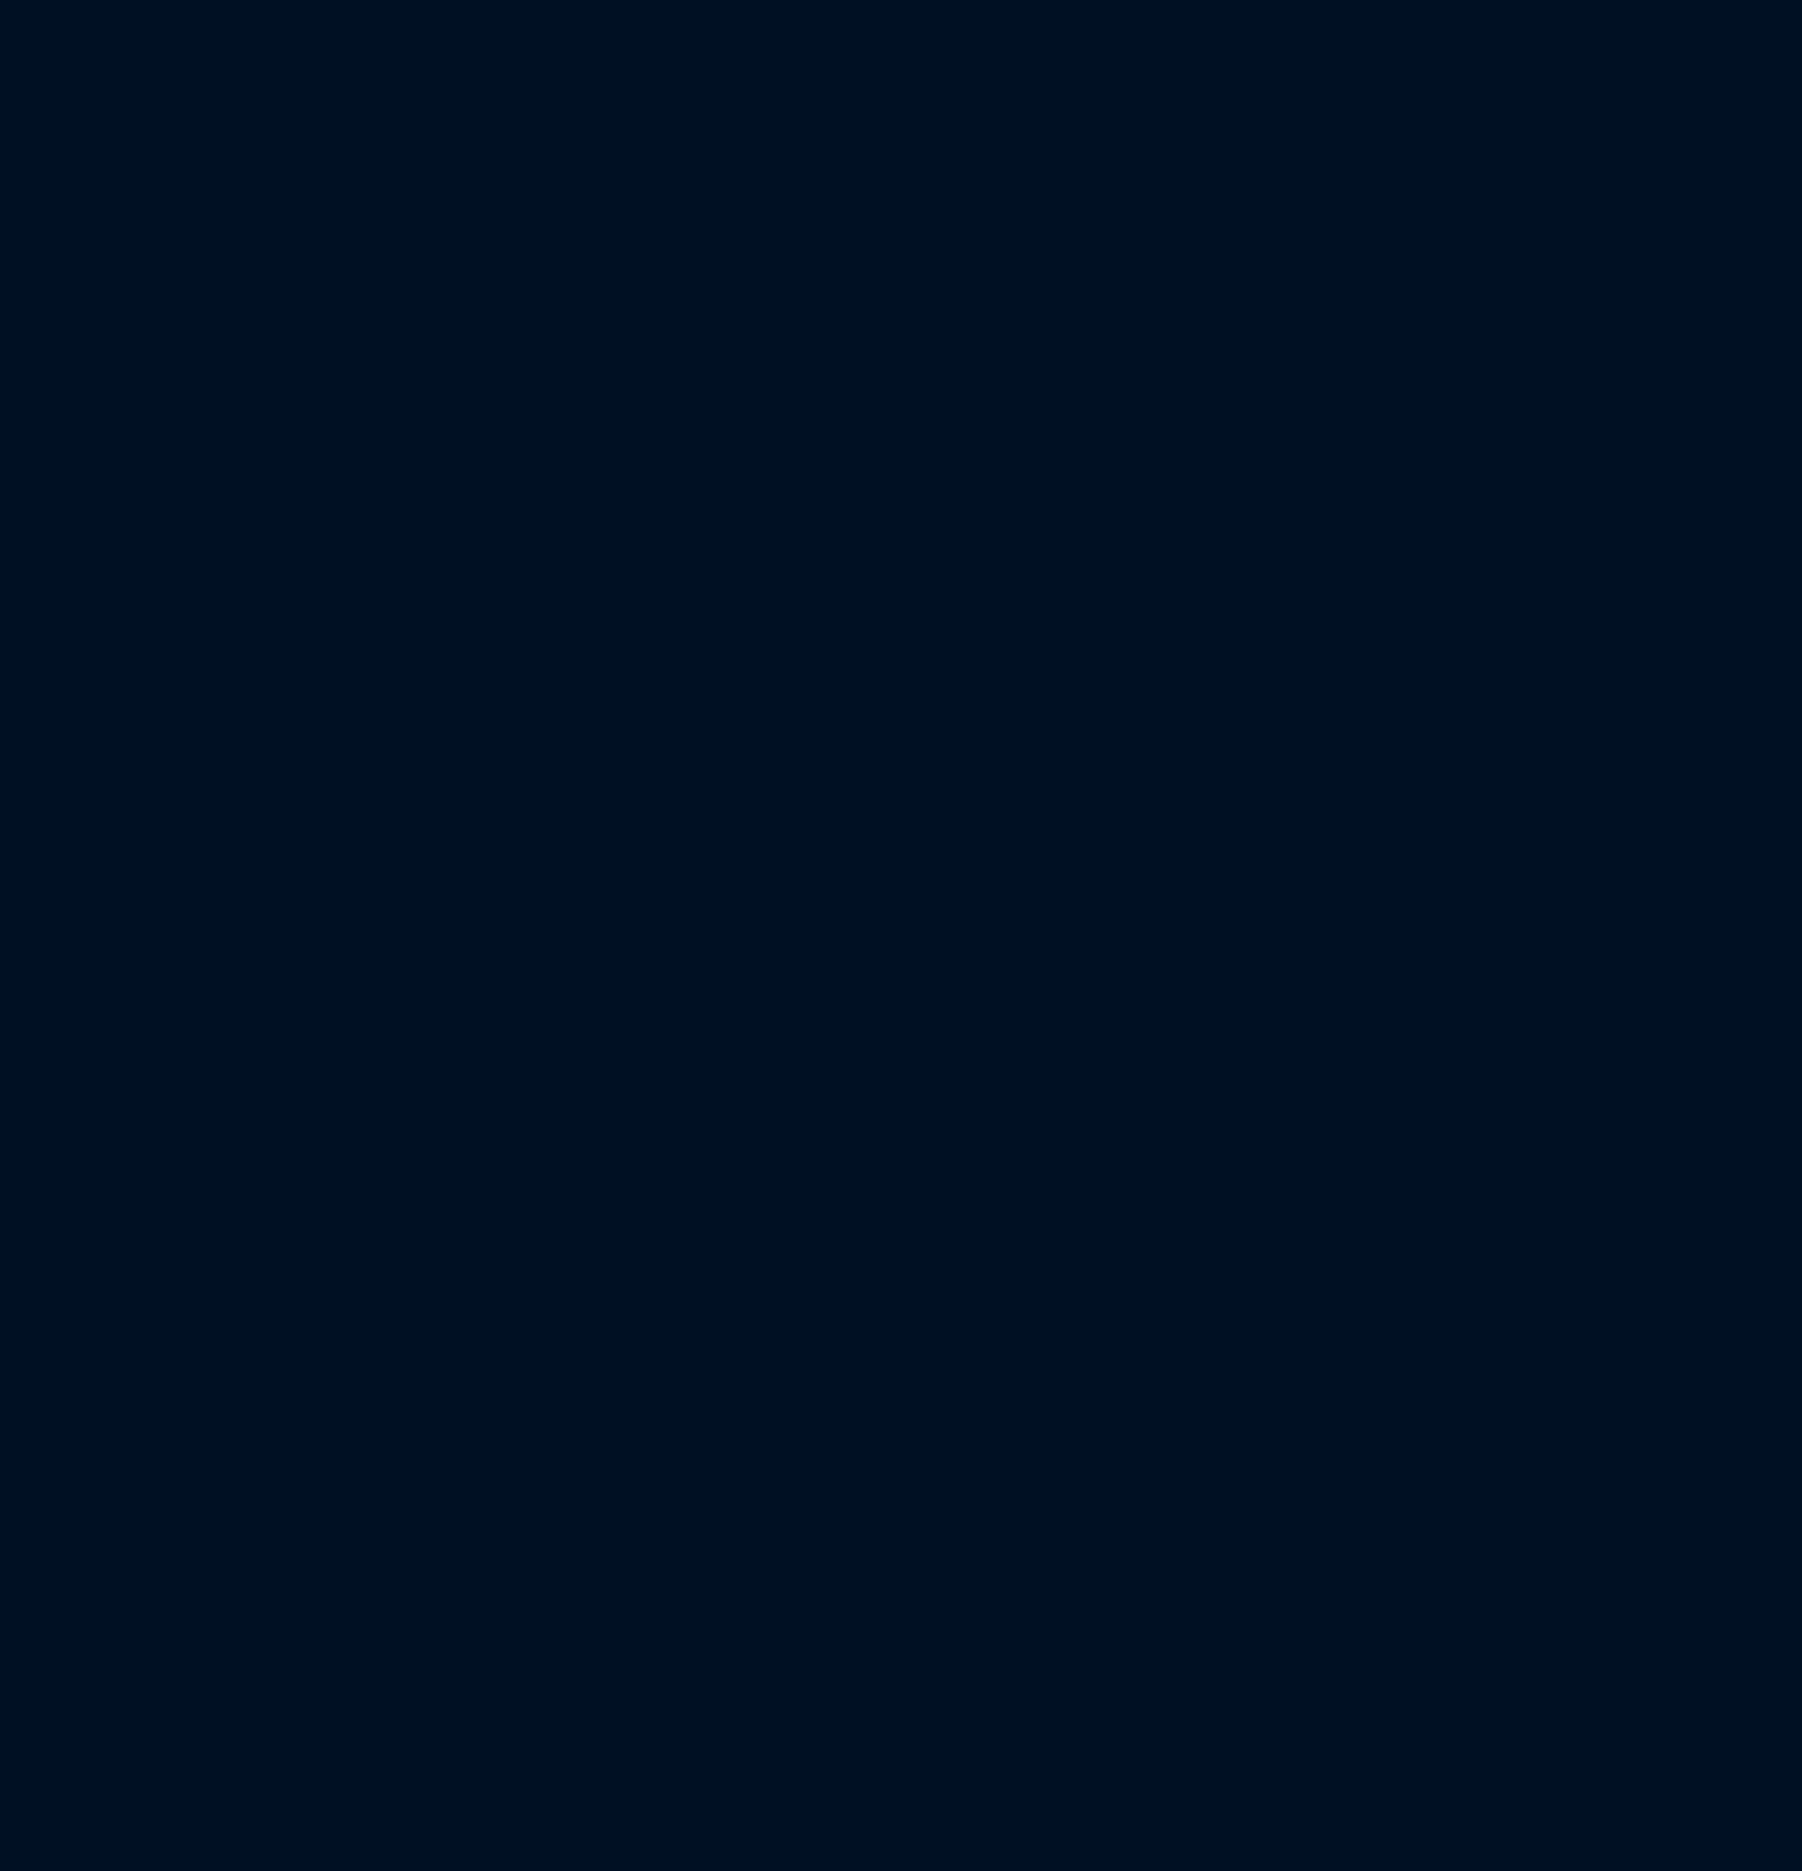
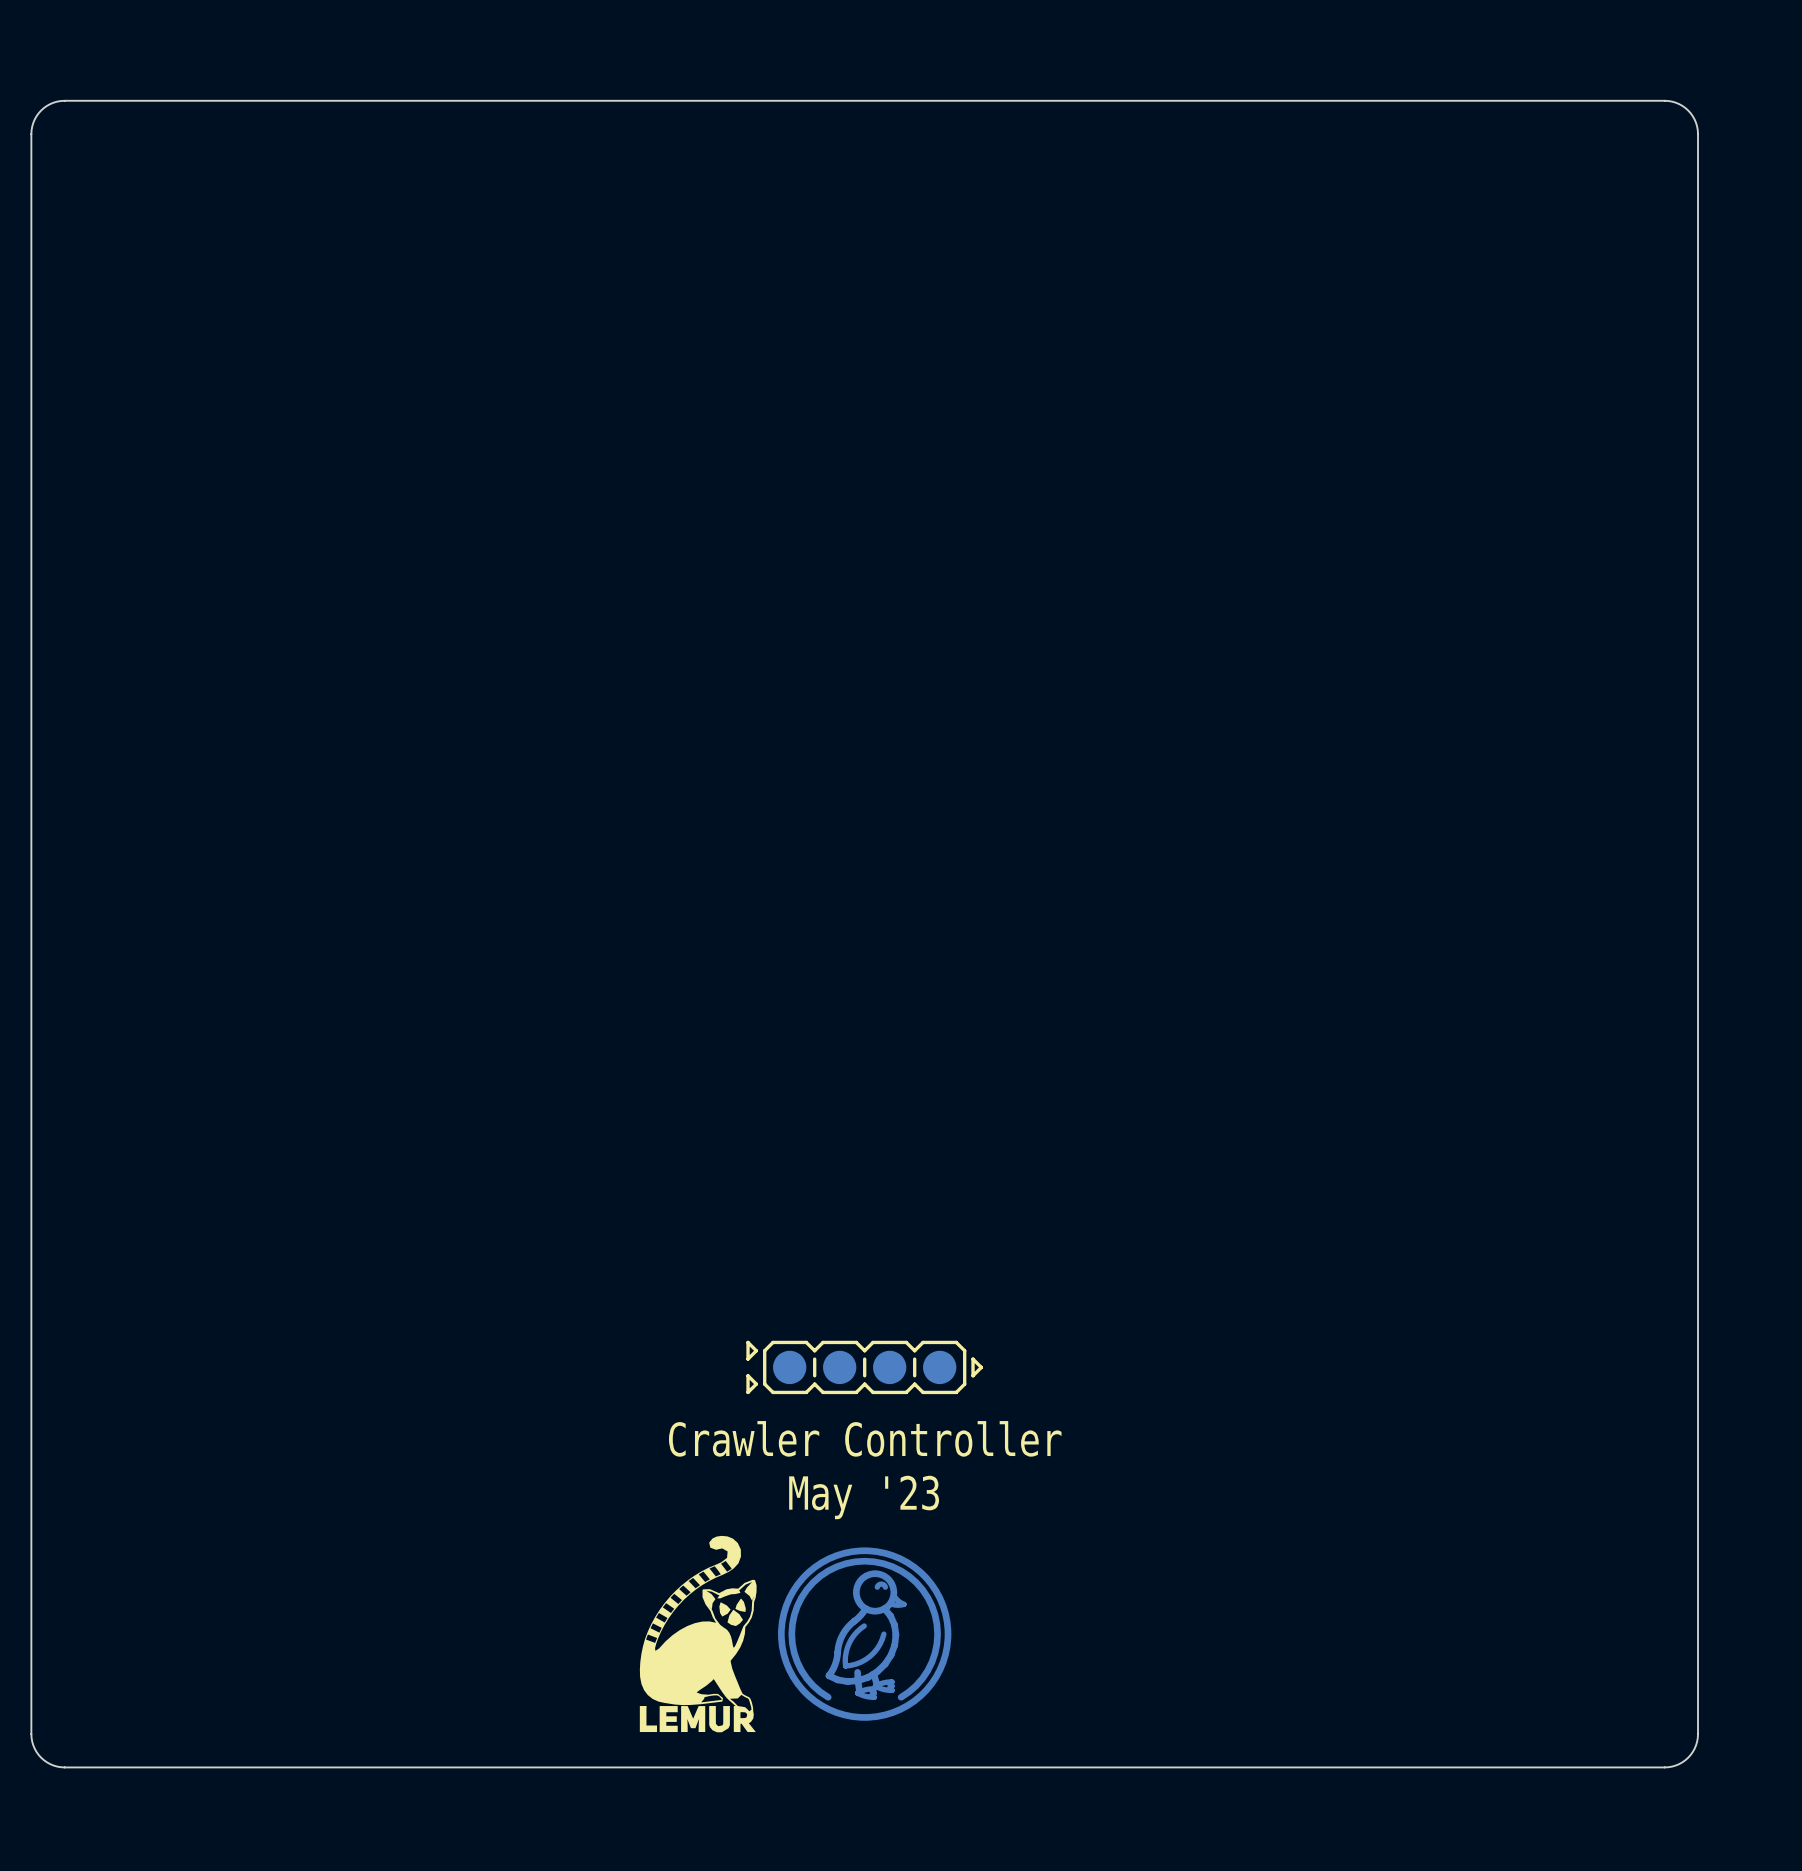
board edge: none -> (1664, 100) (64, 100) (50, 104) (41, 110) (33, 123) (31, 134) (31, 1734) (34, 1748) (41, 1757) (50, 1764) (64, 1767) (1664, 1767) (1675, 1765) (1688, 1757) (1696, 1745) (1698, 1734) (1698, 134) (1696, 123) (1688, 110) (1675, 102) (1664, 100)
drawing: none -> [746, 1340, 984, 1395]
text: none -> Crawler Controller (865, 1438)
text: none -> May '23 (864, 1497)
drawing: none -> [639, 1535, 952, 1733]

